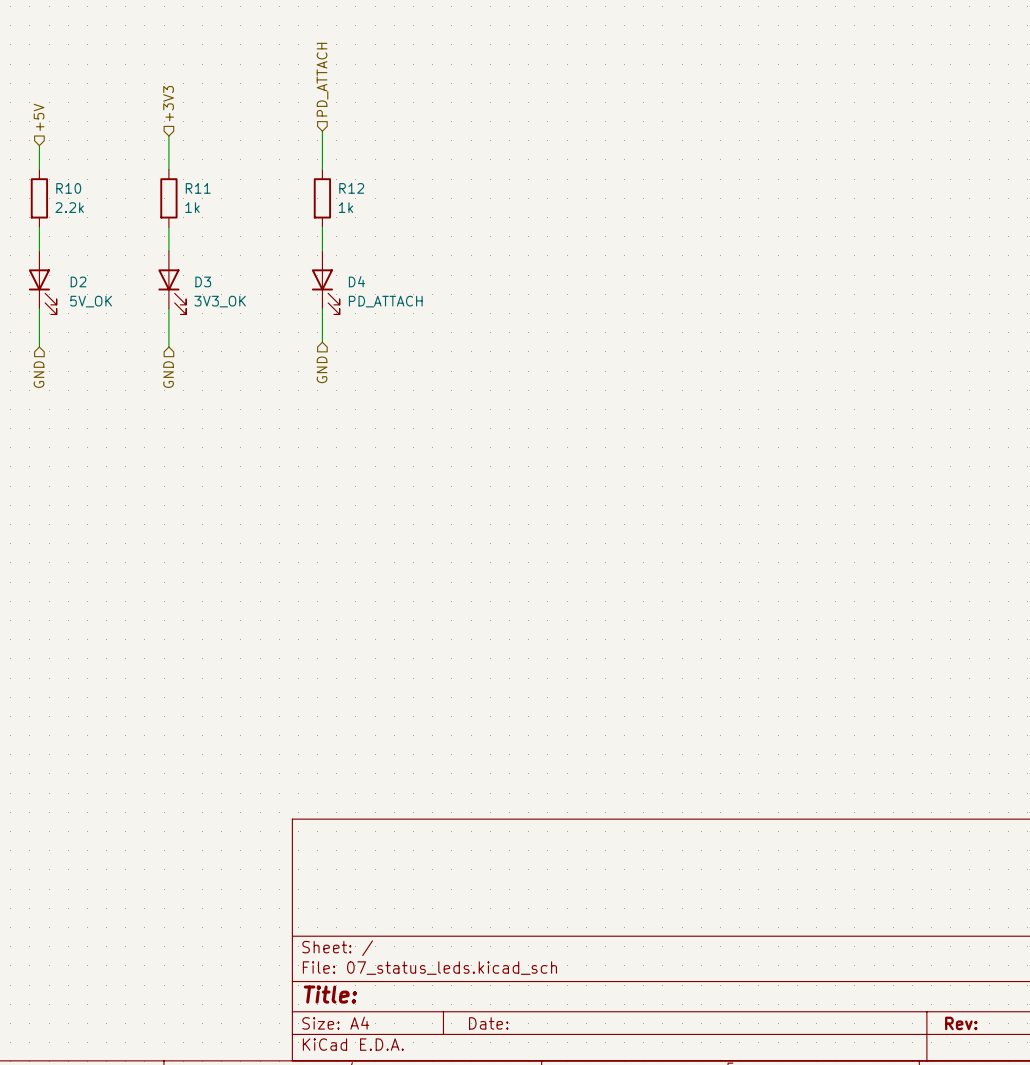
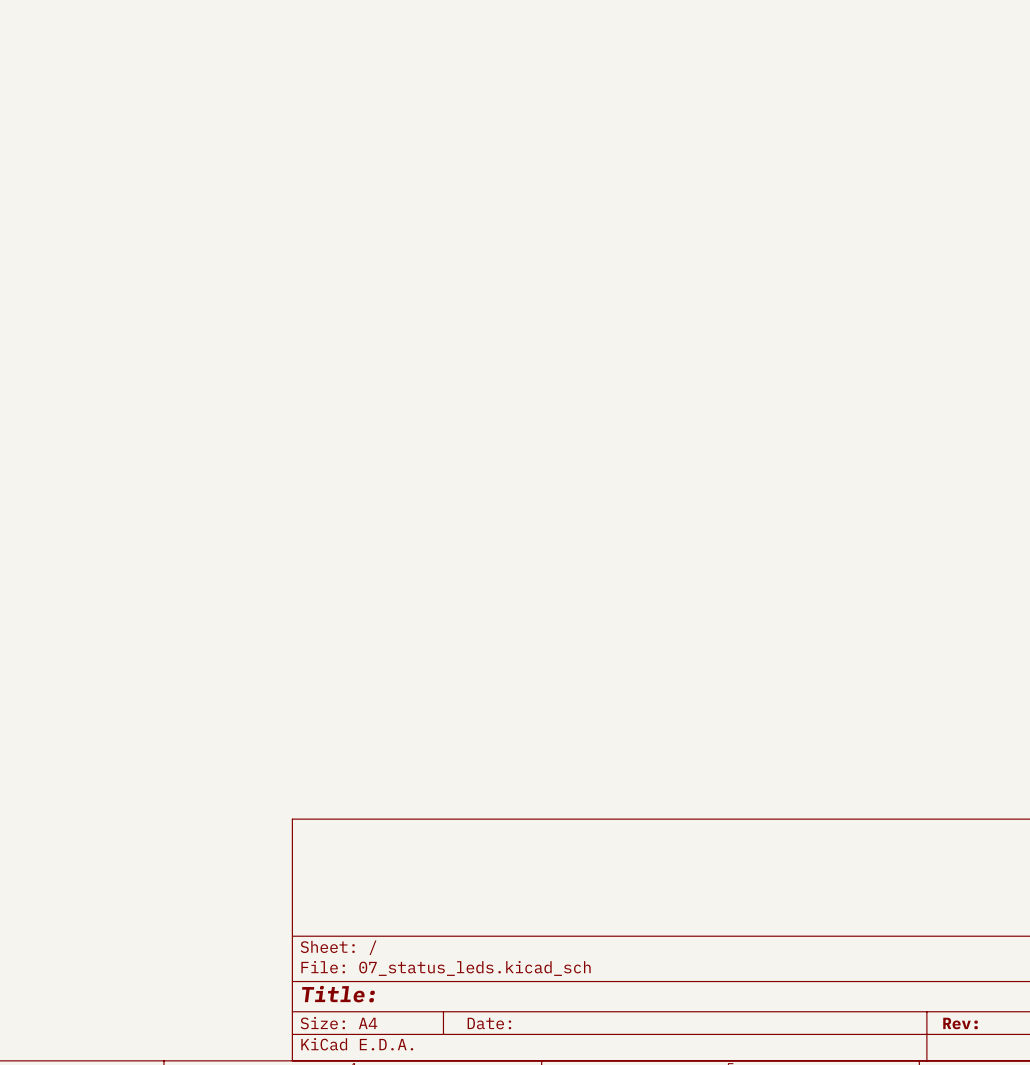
hierarchical label: PD_ATTACH (322, 79) -> none
hierarchical label: +3V3 (168, 103) -> none
hierarchical label: +5V (39, 117) -> none
wire: (322, 131) (322, 169) -> none
wire: (168, 136) (168, 169) -> none
wire: (39, 145) (39, 169) -> none
R10: 2.2k (39, 198) -> none
R11: 1k (168, 198) -> none
R12: 1k (322, 198) -> none
wire: (39, 227) (39, 251) -> none
wire: (168, 227) (168, 251) -> none
wire: (322, 227) (322, 251) -> none
D2: 5V_OK (42, 282) -> none
D3: 3V3_OK (172, 282) -> none
D4: PD_ATTACH (325, 282) -> none
wire: (39, 308) (39, 347) -> none
wire: (168, 308) (168, 347) -> none
wire: (322, 308) (322, 342) -> none
hierarchical label: GND (322, 369) -> none
hierarchical label: GND (39, 374) -> none
hierarchical label: GND (168, 374) -> none

